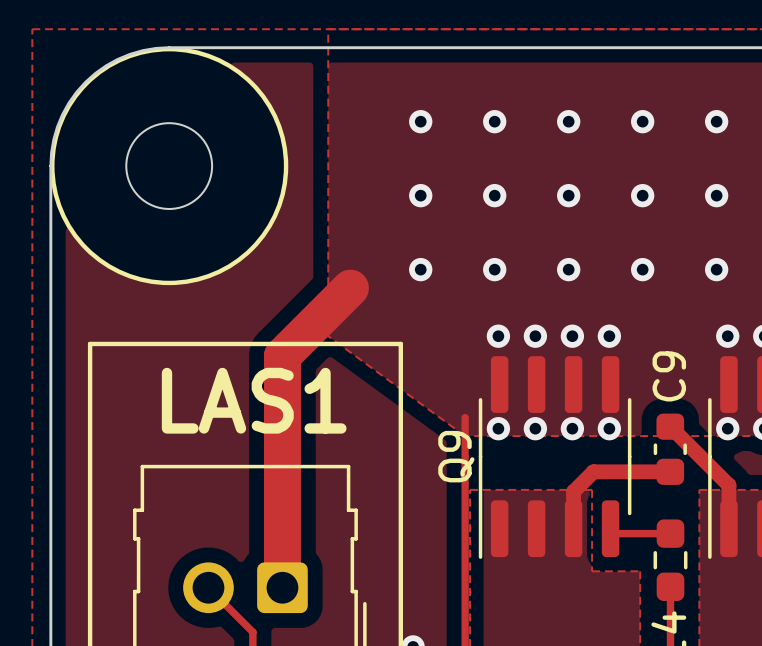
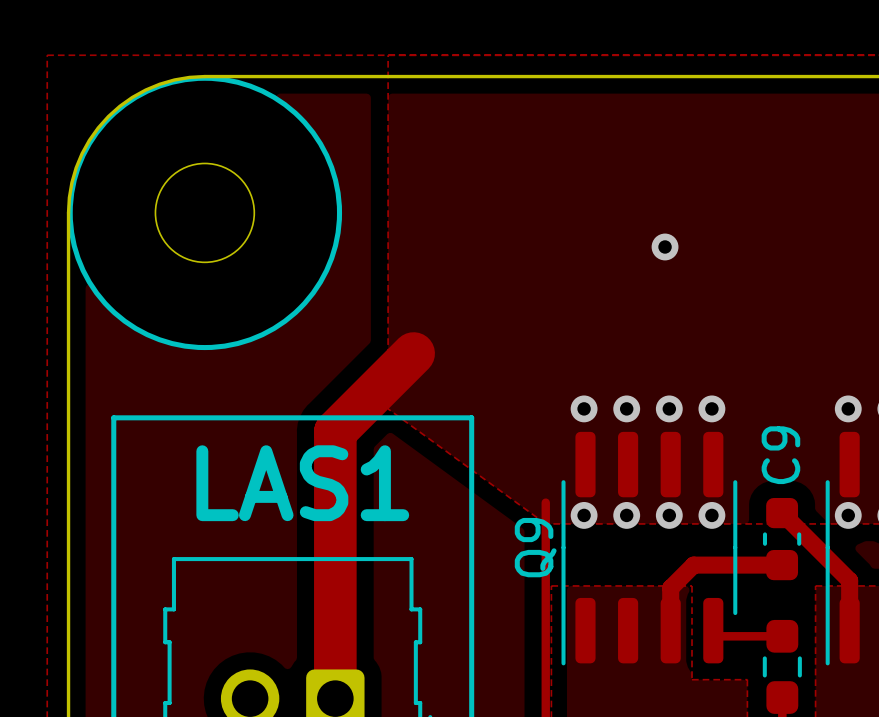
via: (420, 121) -> none
via: (494, 121) -> none
via: (568, 121) -> none
via: (642, 121) -> none
via: (716, 121) -> none
via: (420, 195) -> none
via: (494, 195) -> none
via: (642, 195) -> none
via: (716, 195) -> none
via: (420, 269) -> none
via: (494, 269) -> none
via: (568, 269) -> none
via: (642, 269) -> none
via: (716, 269) -> none

